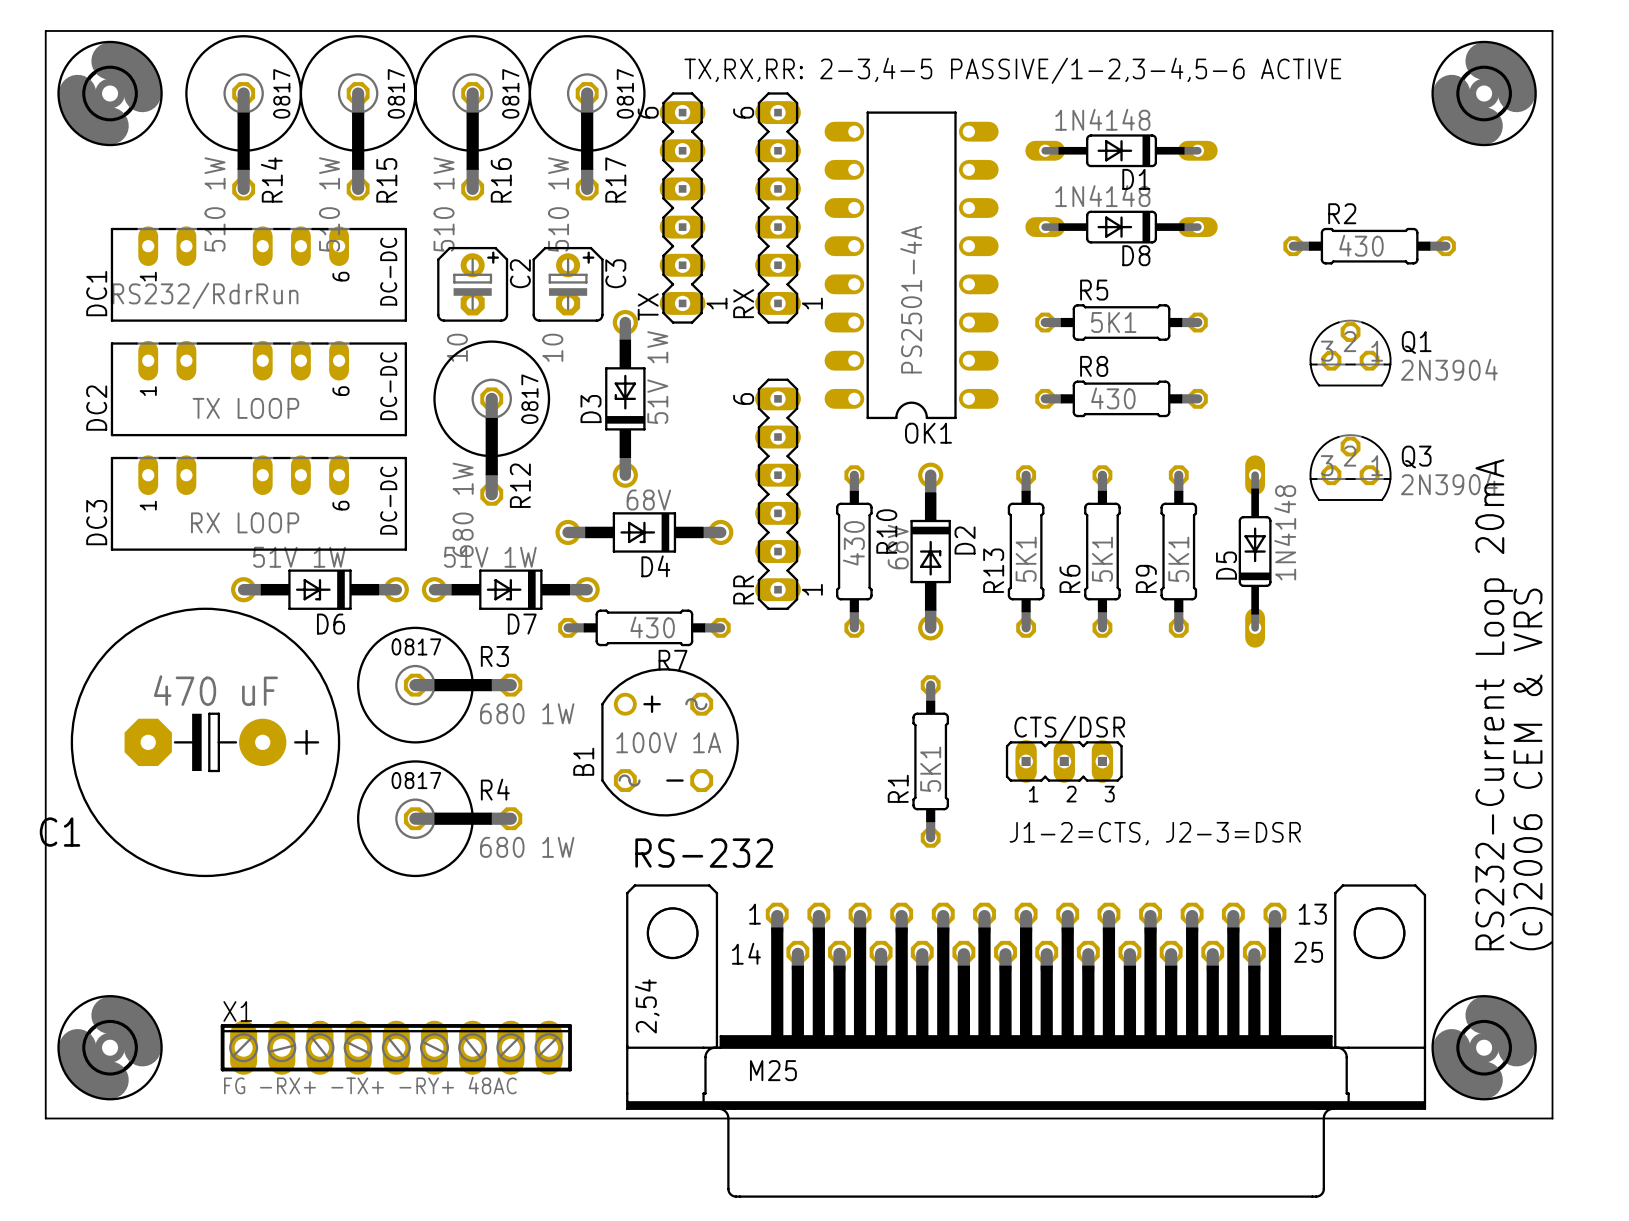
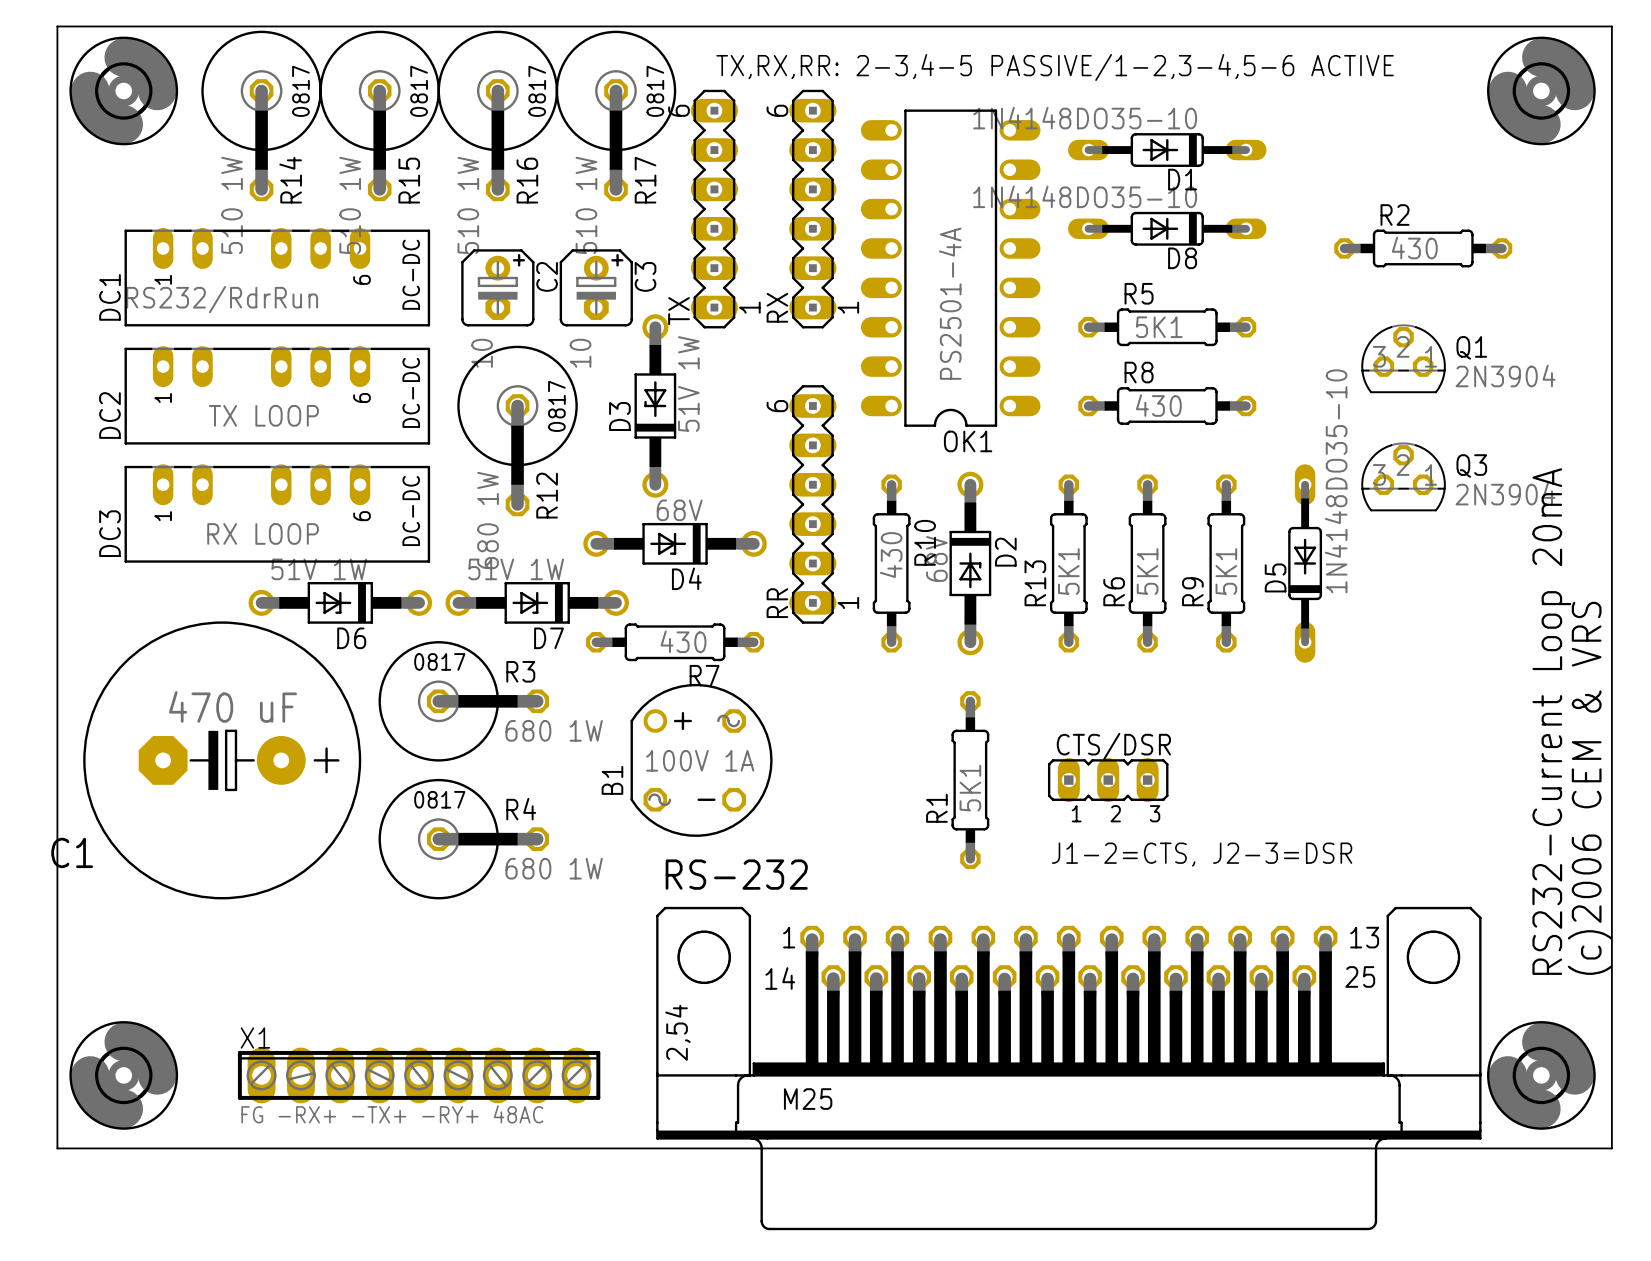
D1 value: 1N4148 (1102, 119) -> 1N4148DO35-10 (1085, 118)
D8 value: 1N4148 (1102, 196) -> 1N4148DO35-10 (1085, 196)
D5 value: 1N4148 (1285, 532) -> 1N4148DO35-10 (1336, 481)

